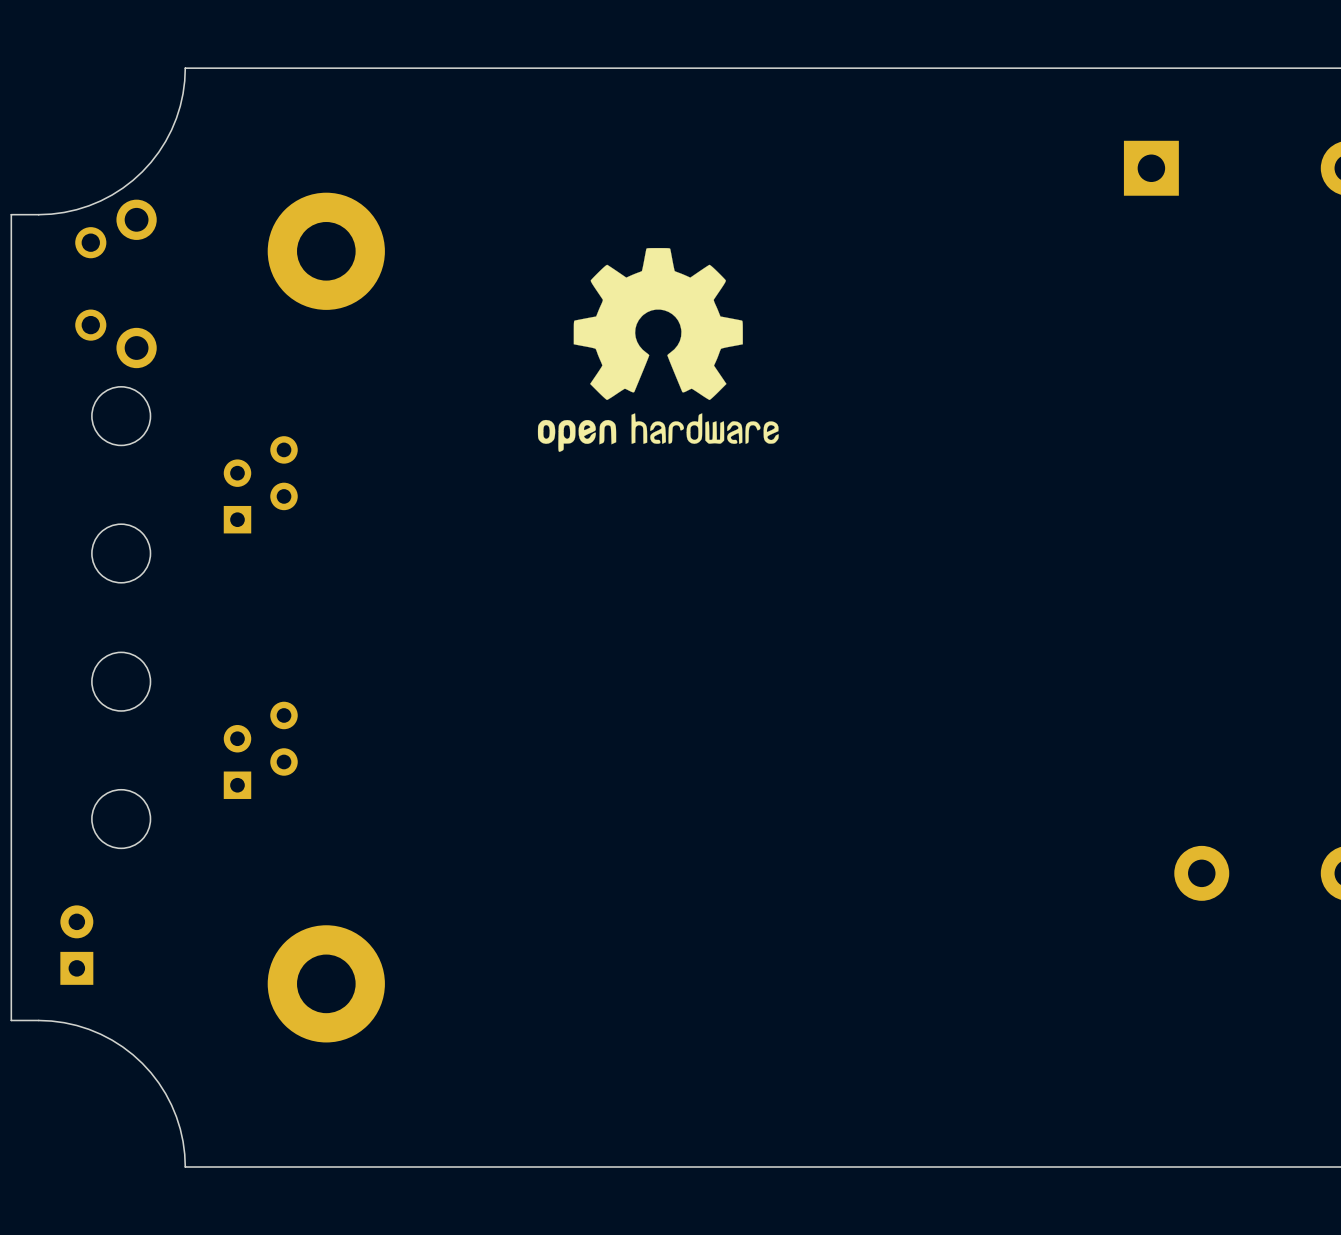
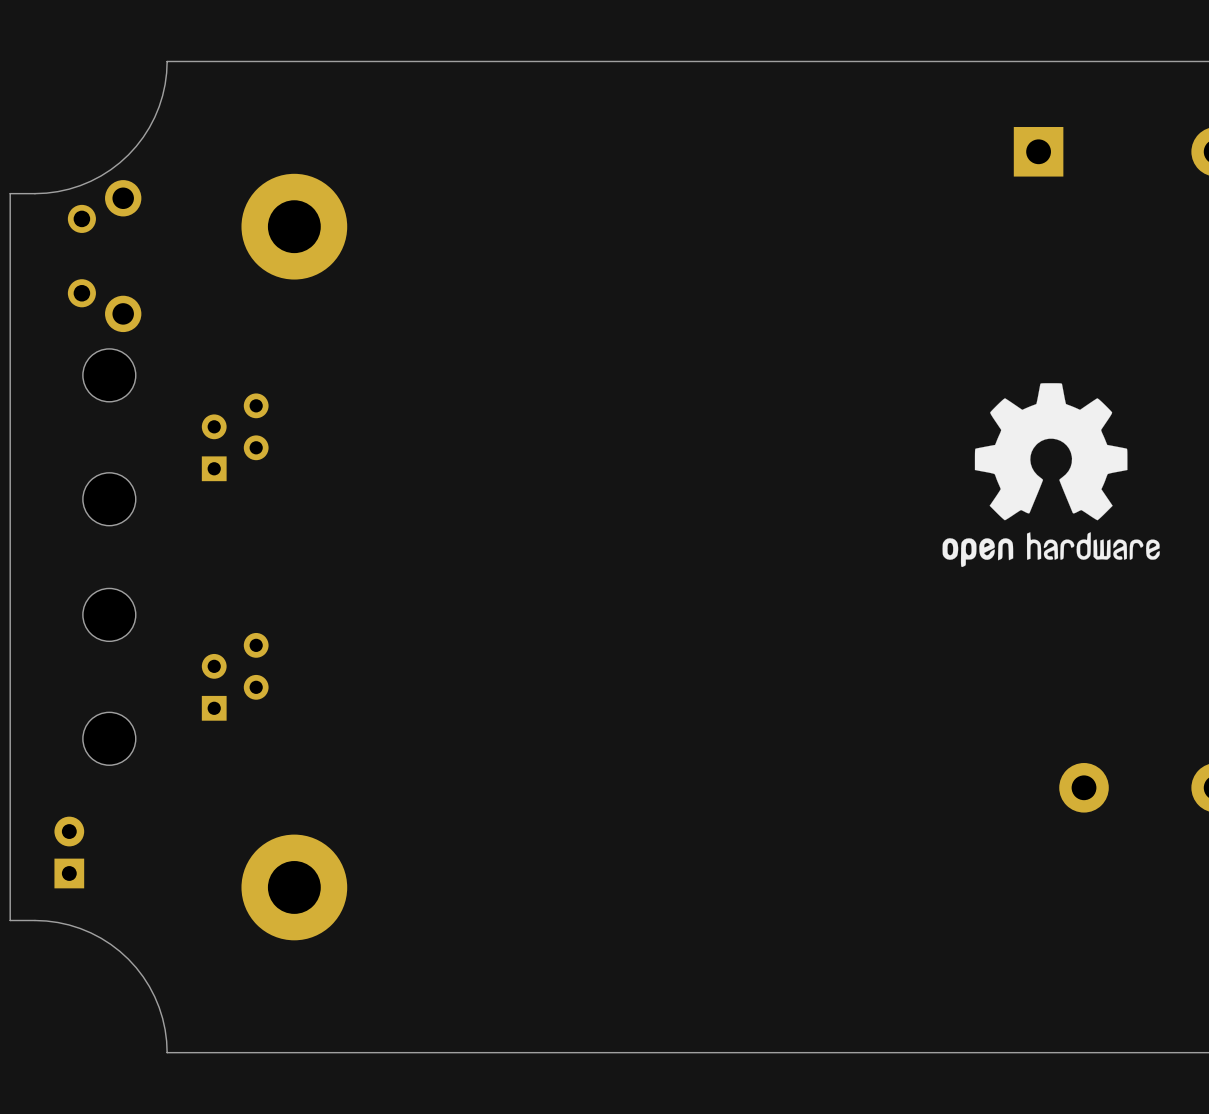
drawing: [537, 248, 779, 452] -> none
drawing: none -> [942, 383, 1160, 568]

